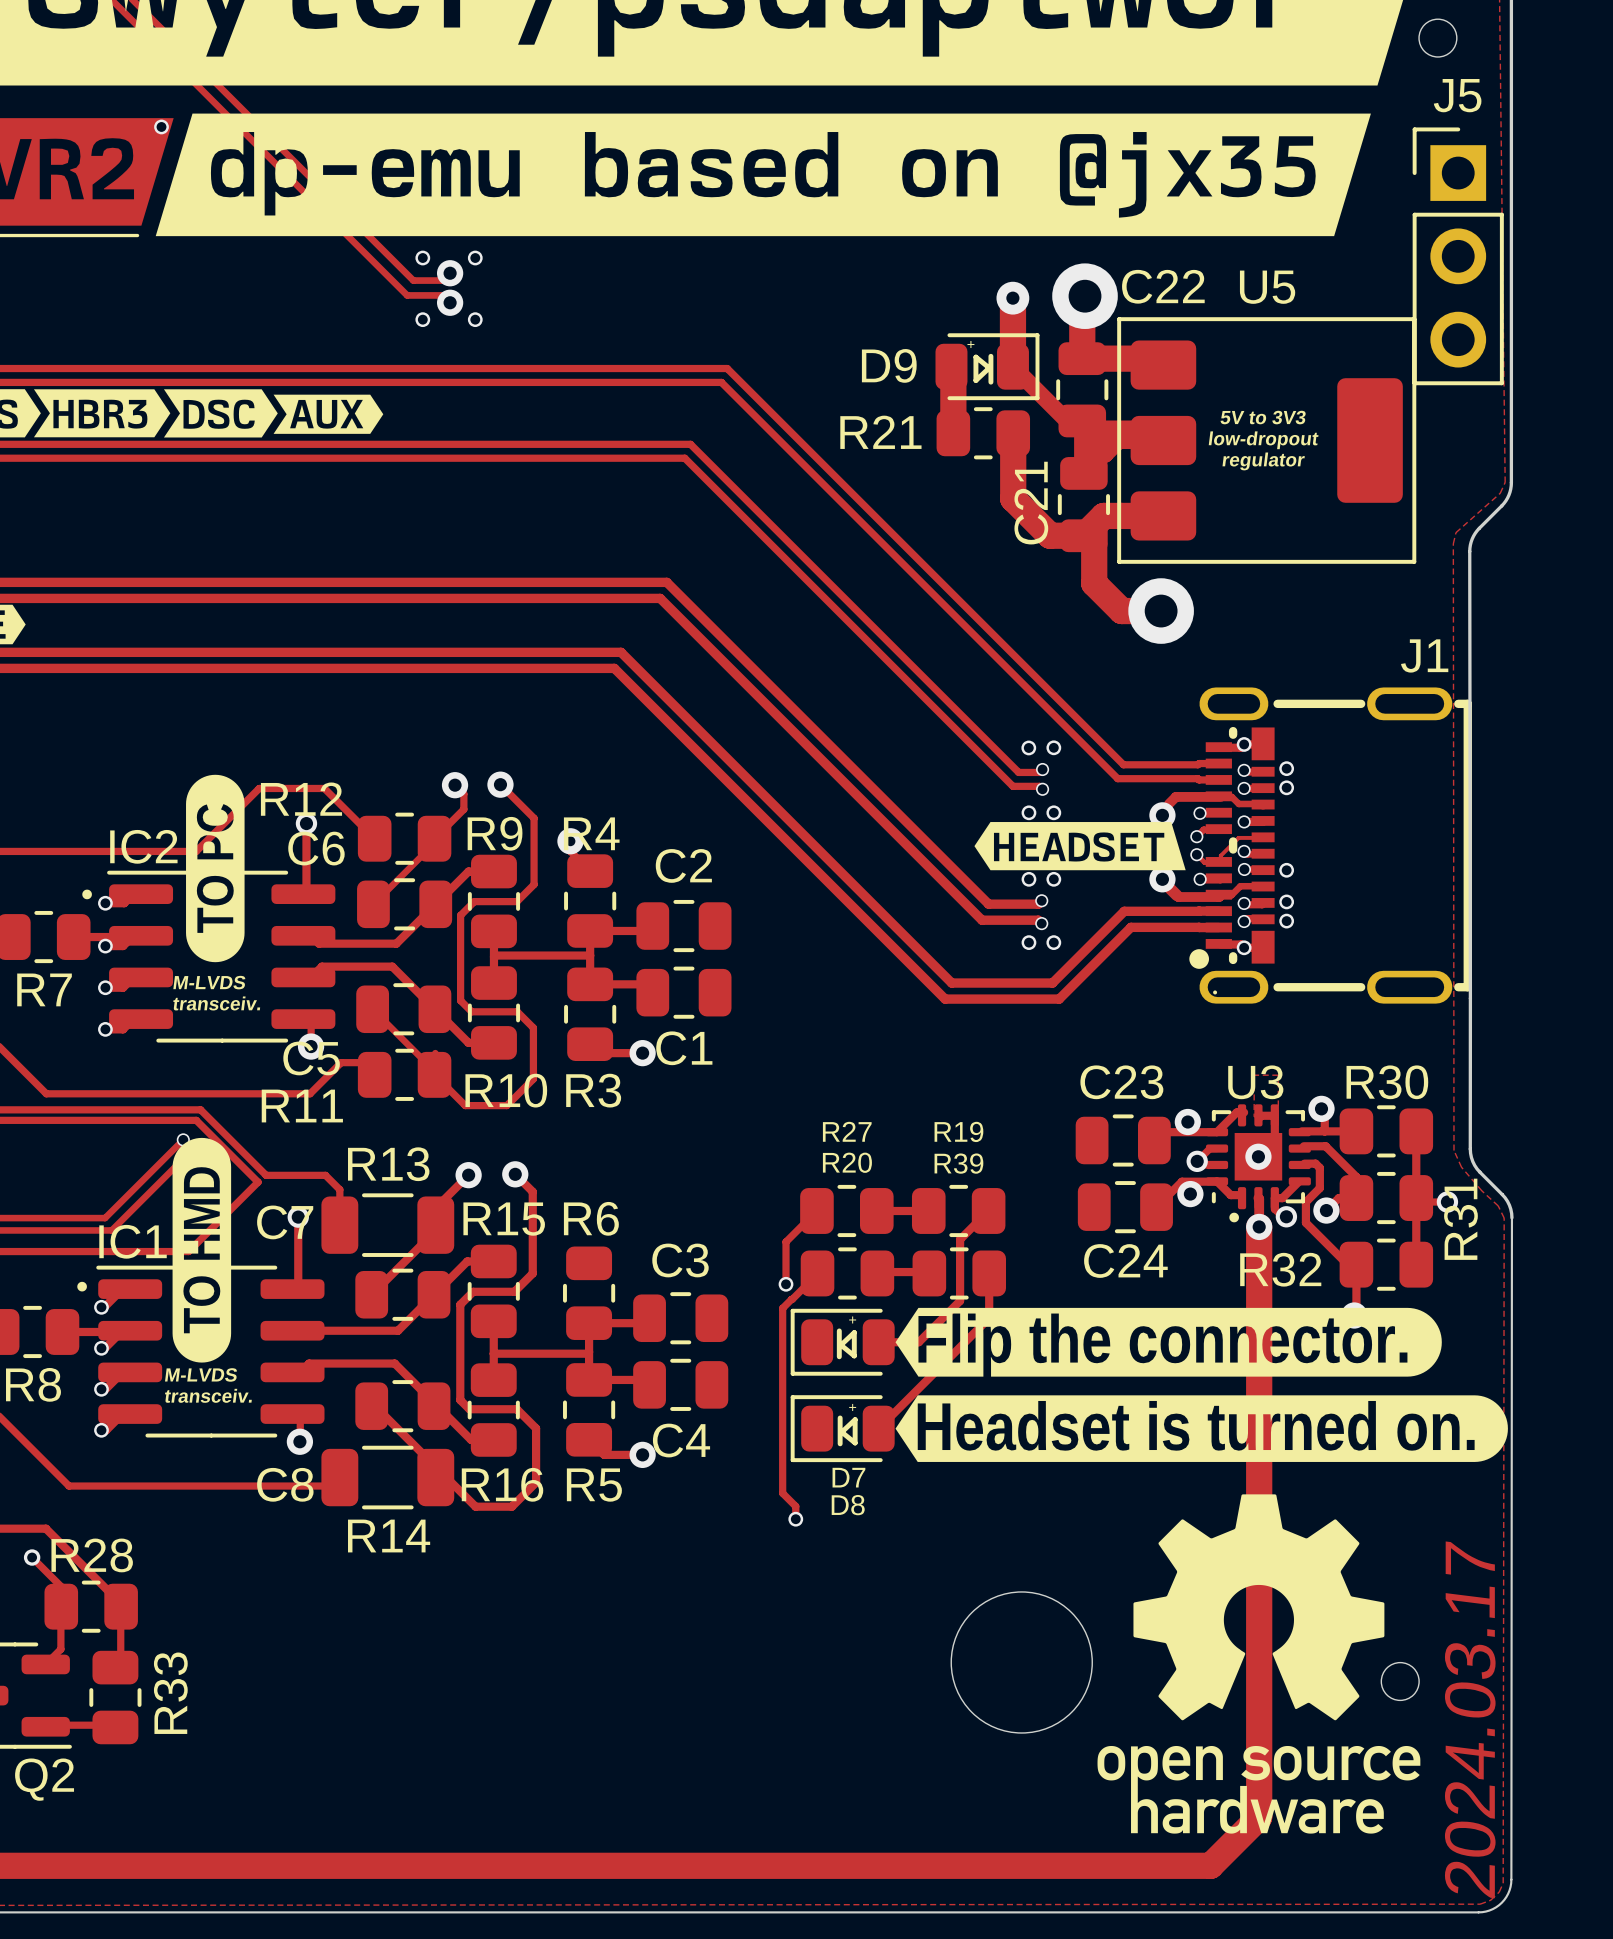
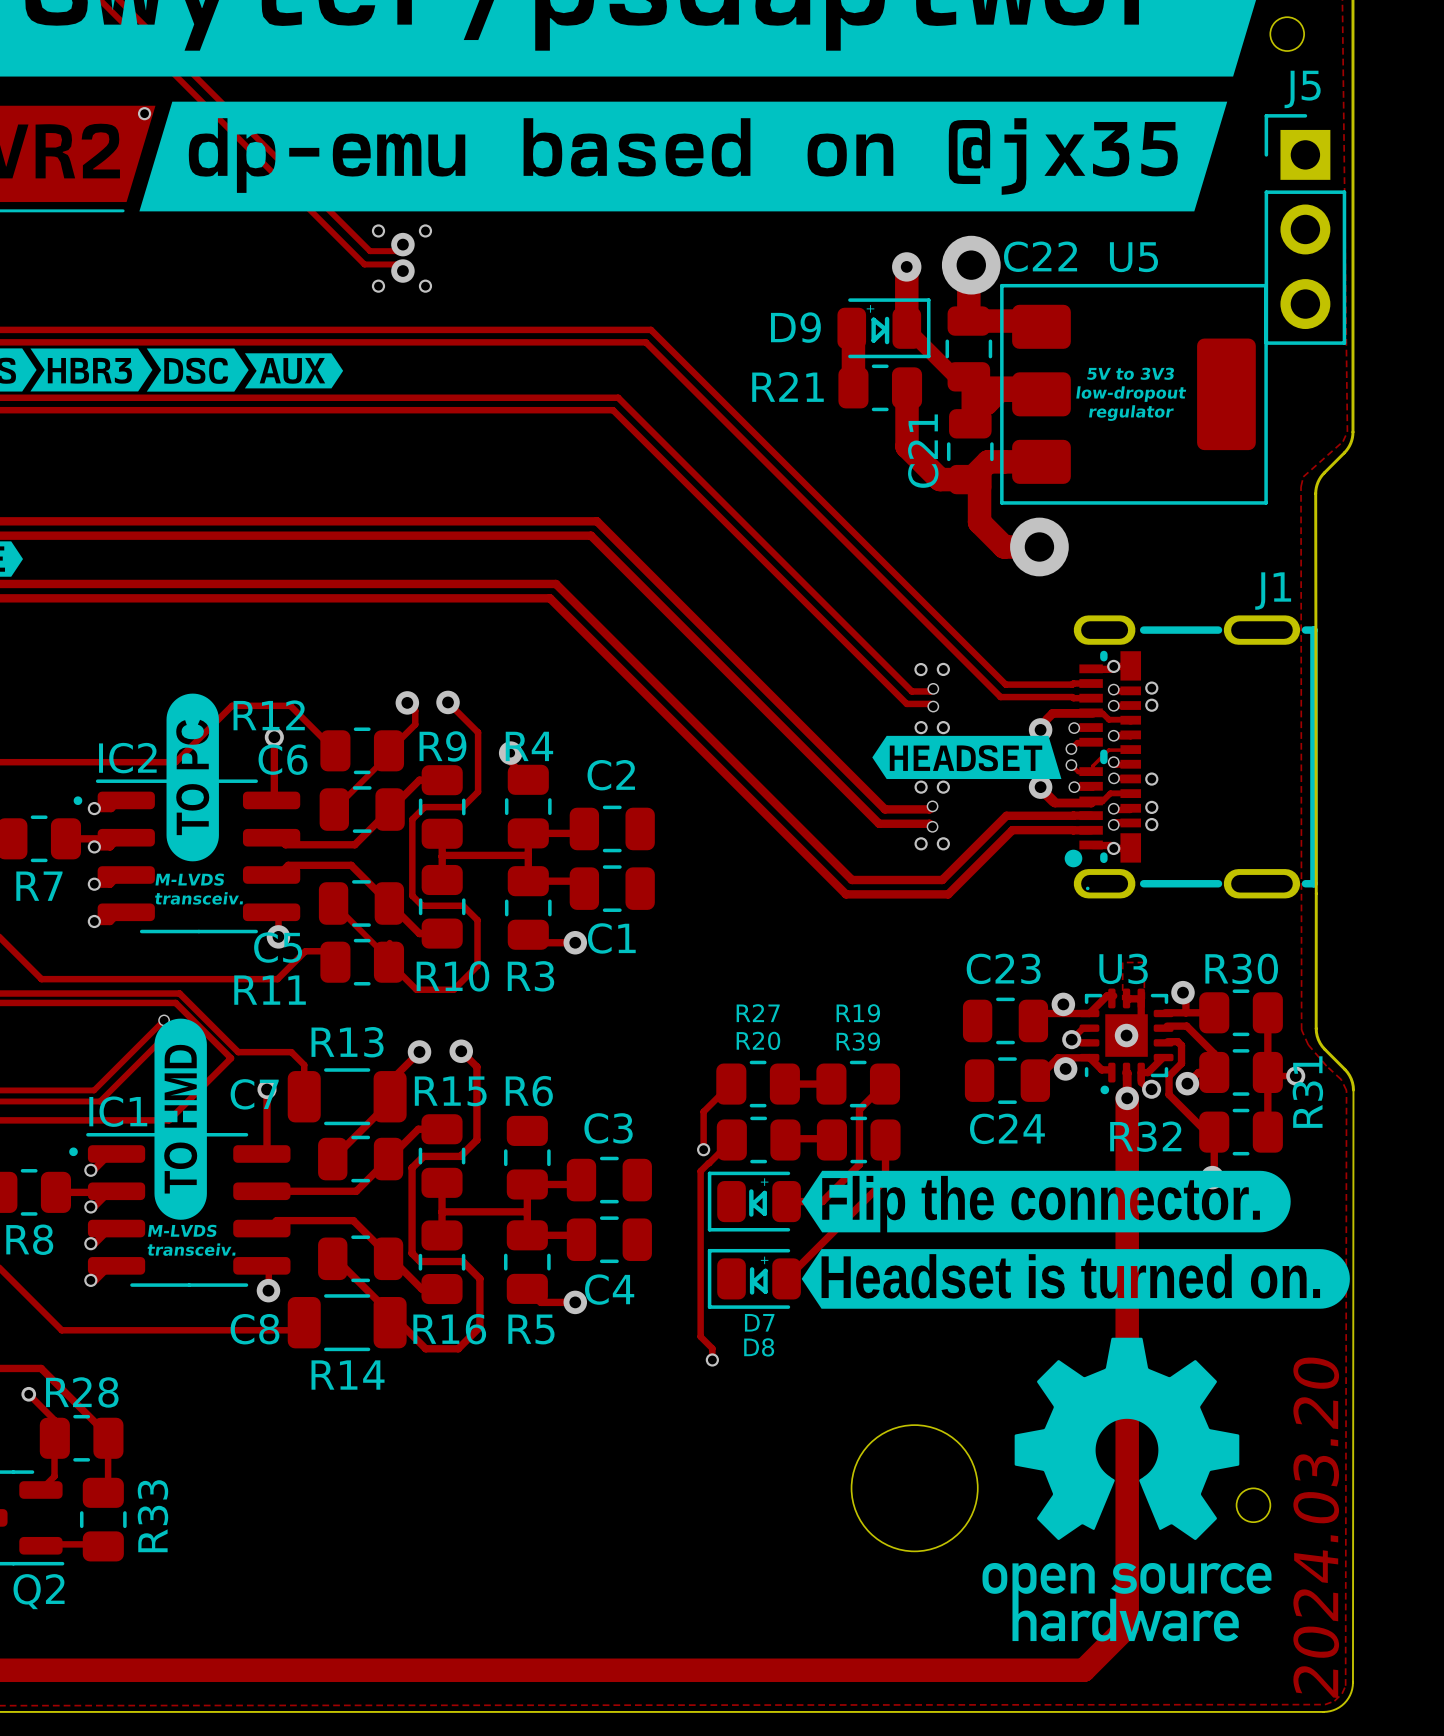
text: 2024.03.17 (1470, 1719) -> 2024.03.20 (1316, 1527)

